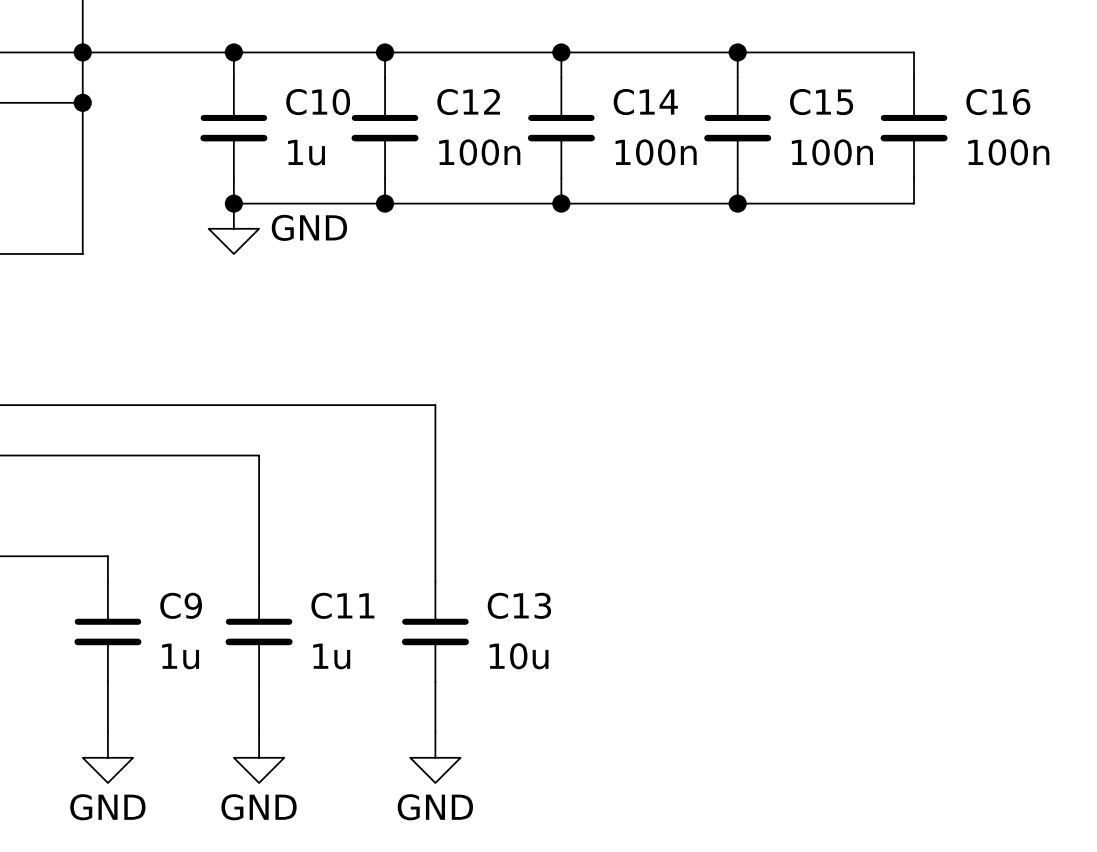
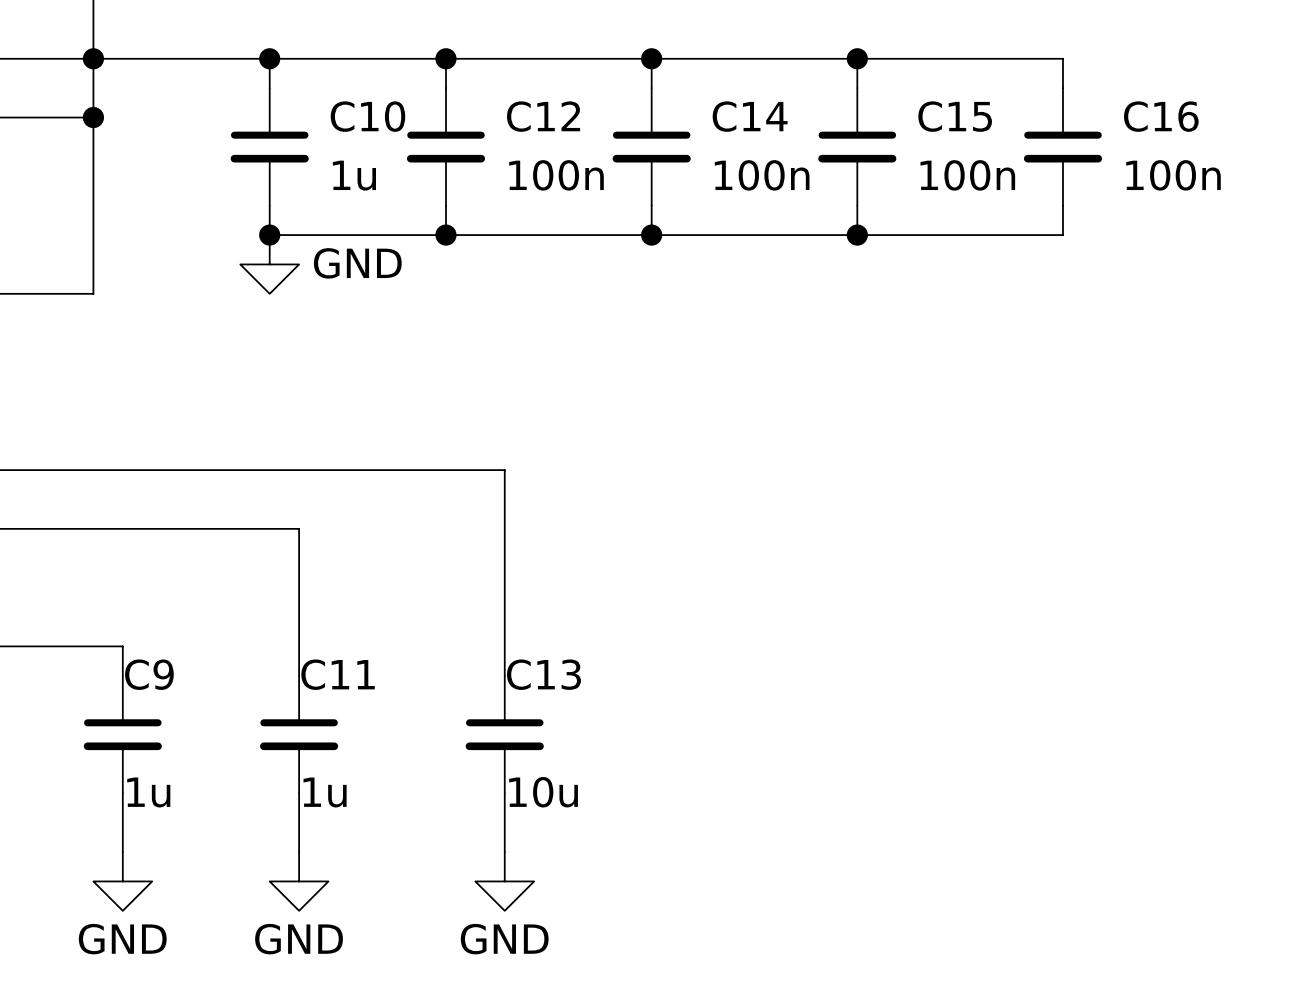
C9 name position: C9 (181, 605) -> C9 (149, 674)
C11 name position: C11 (342, 605) -> C11 (338, 674)
C13 name position: C13 (519, 605) -> C13 (543, 674)
C9 value position: 1u (180, 656) -> 1u (148, 792)
C11 value position: 1u (331, 656) -> 1u (325, 792)
C13 value position: 10u (519, 656) -> 10u (543, 792)

